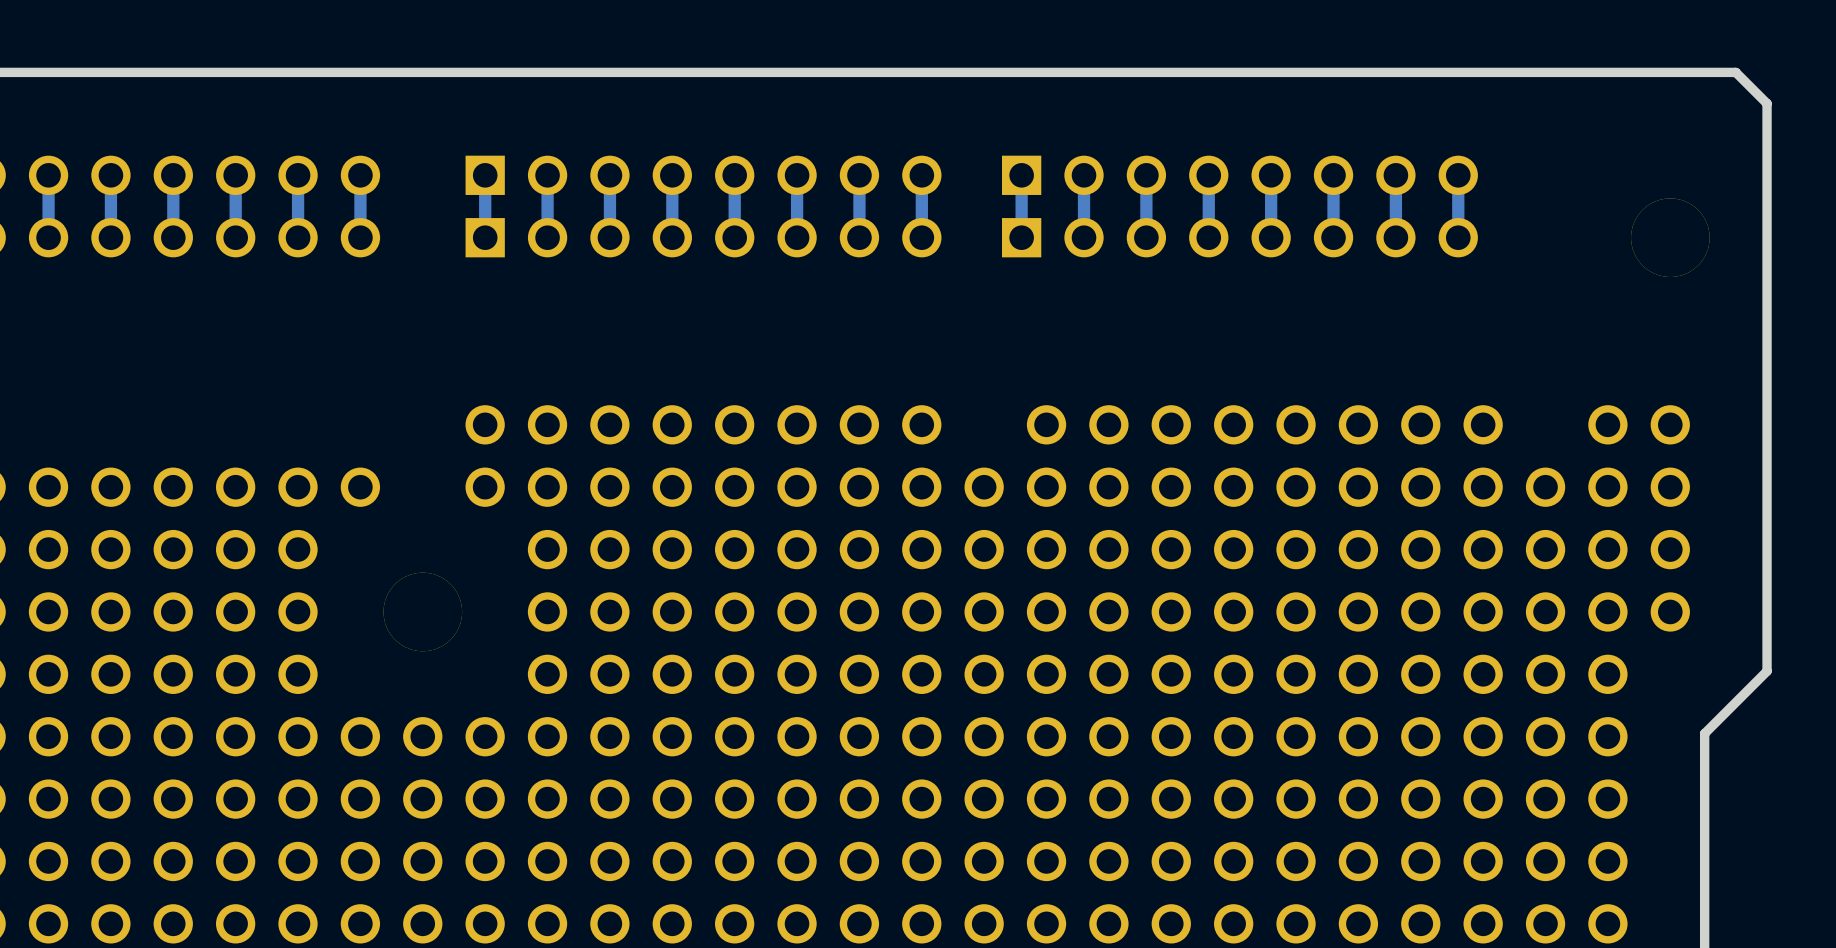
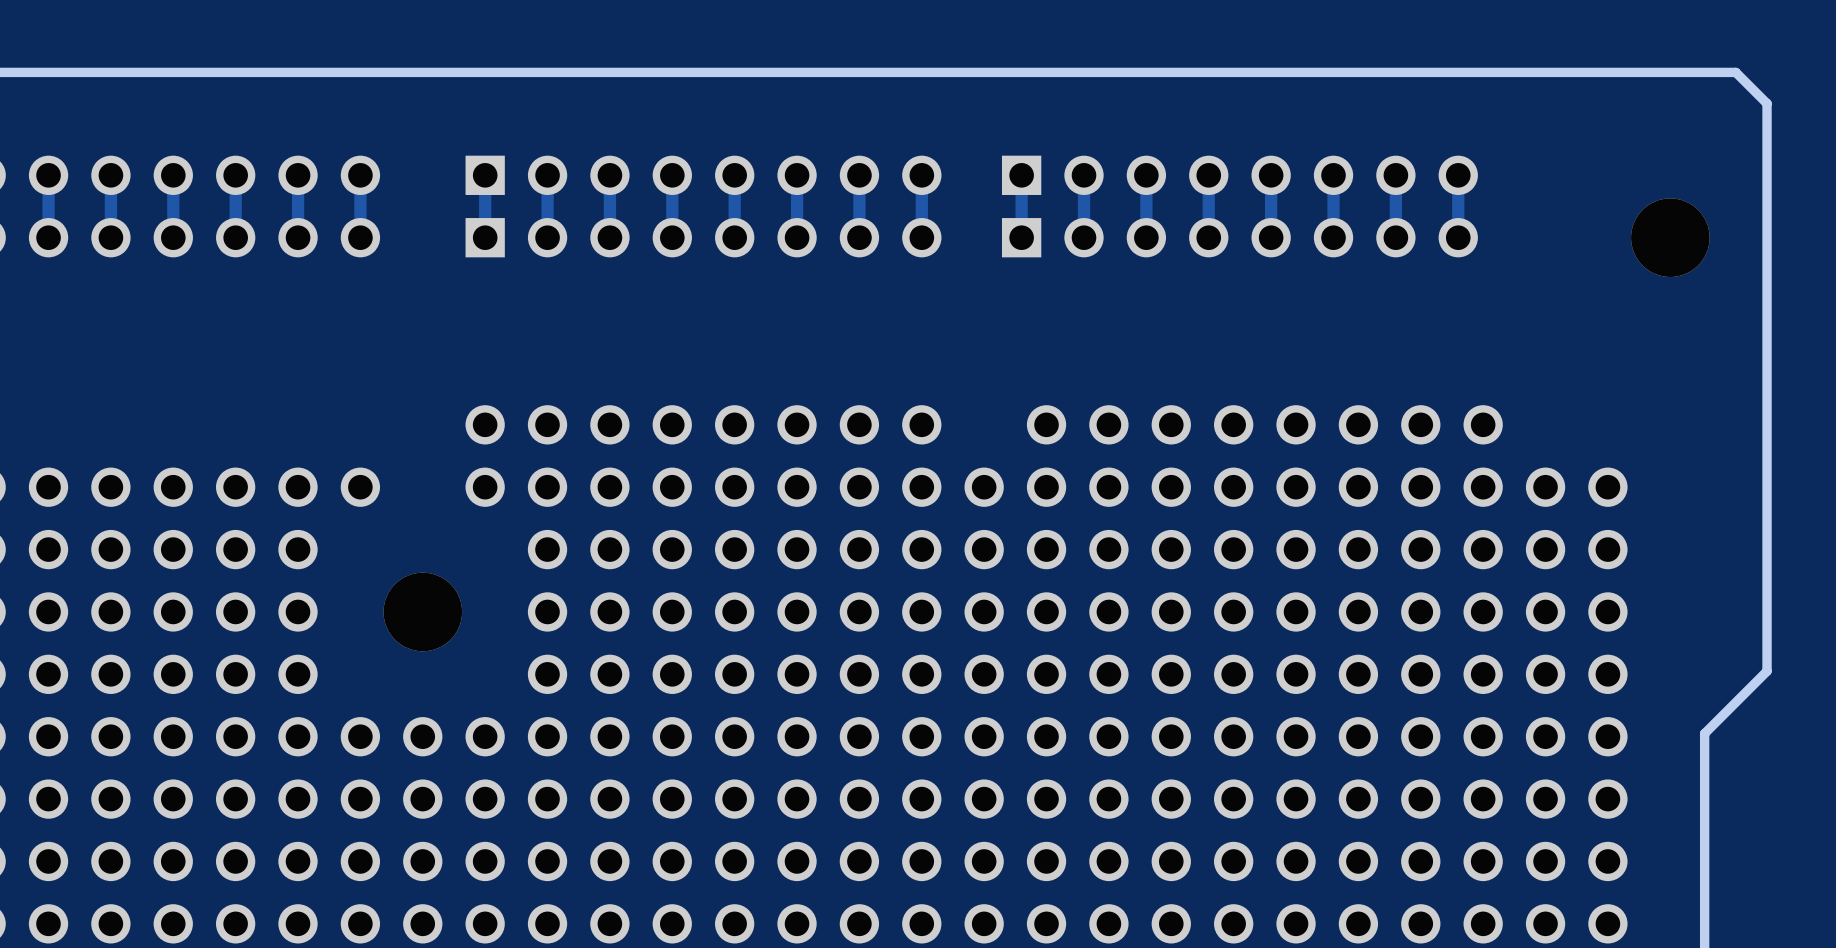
part: (1607, 424) -> none
part: (1670, 424) -> none
part: (1670, 487) -> none
part: (1670, 549) -> none
part: (1670, 611) -> none

